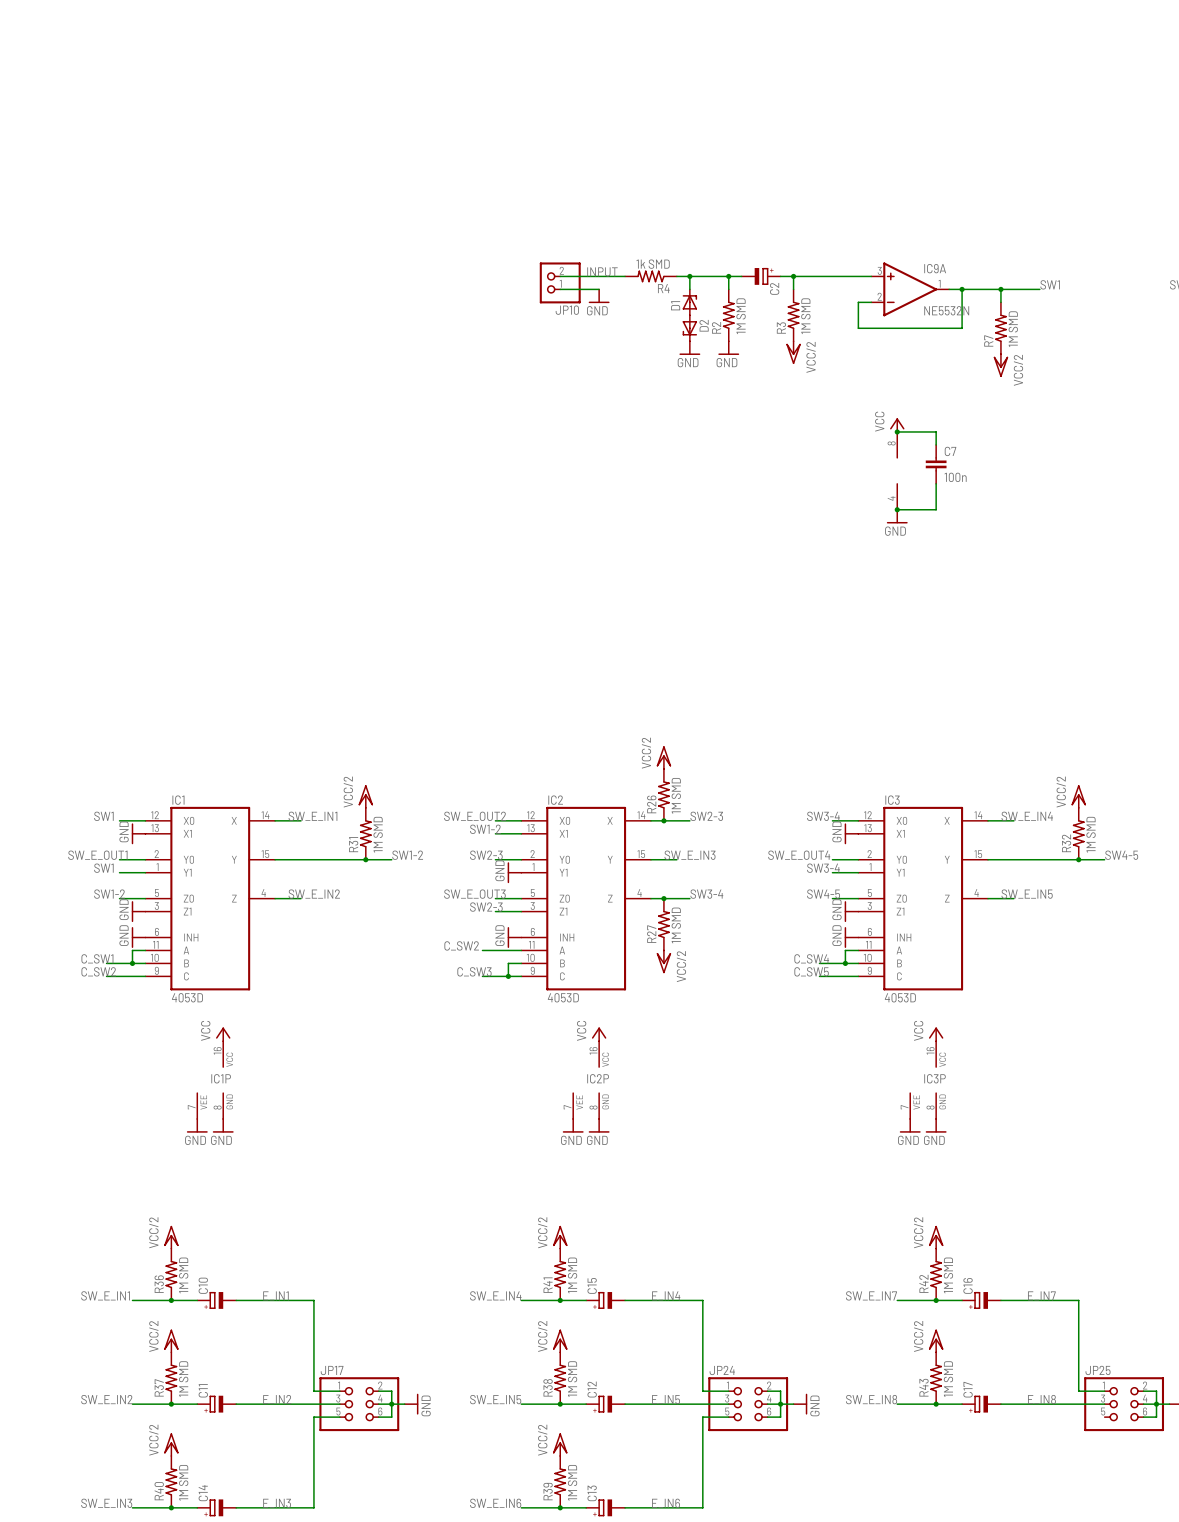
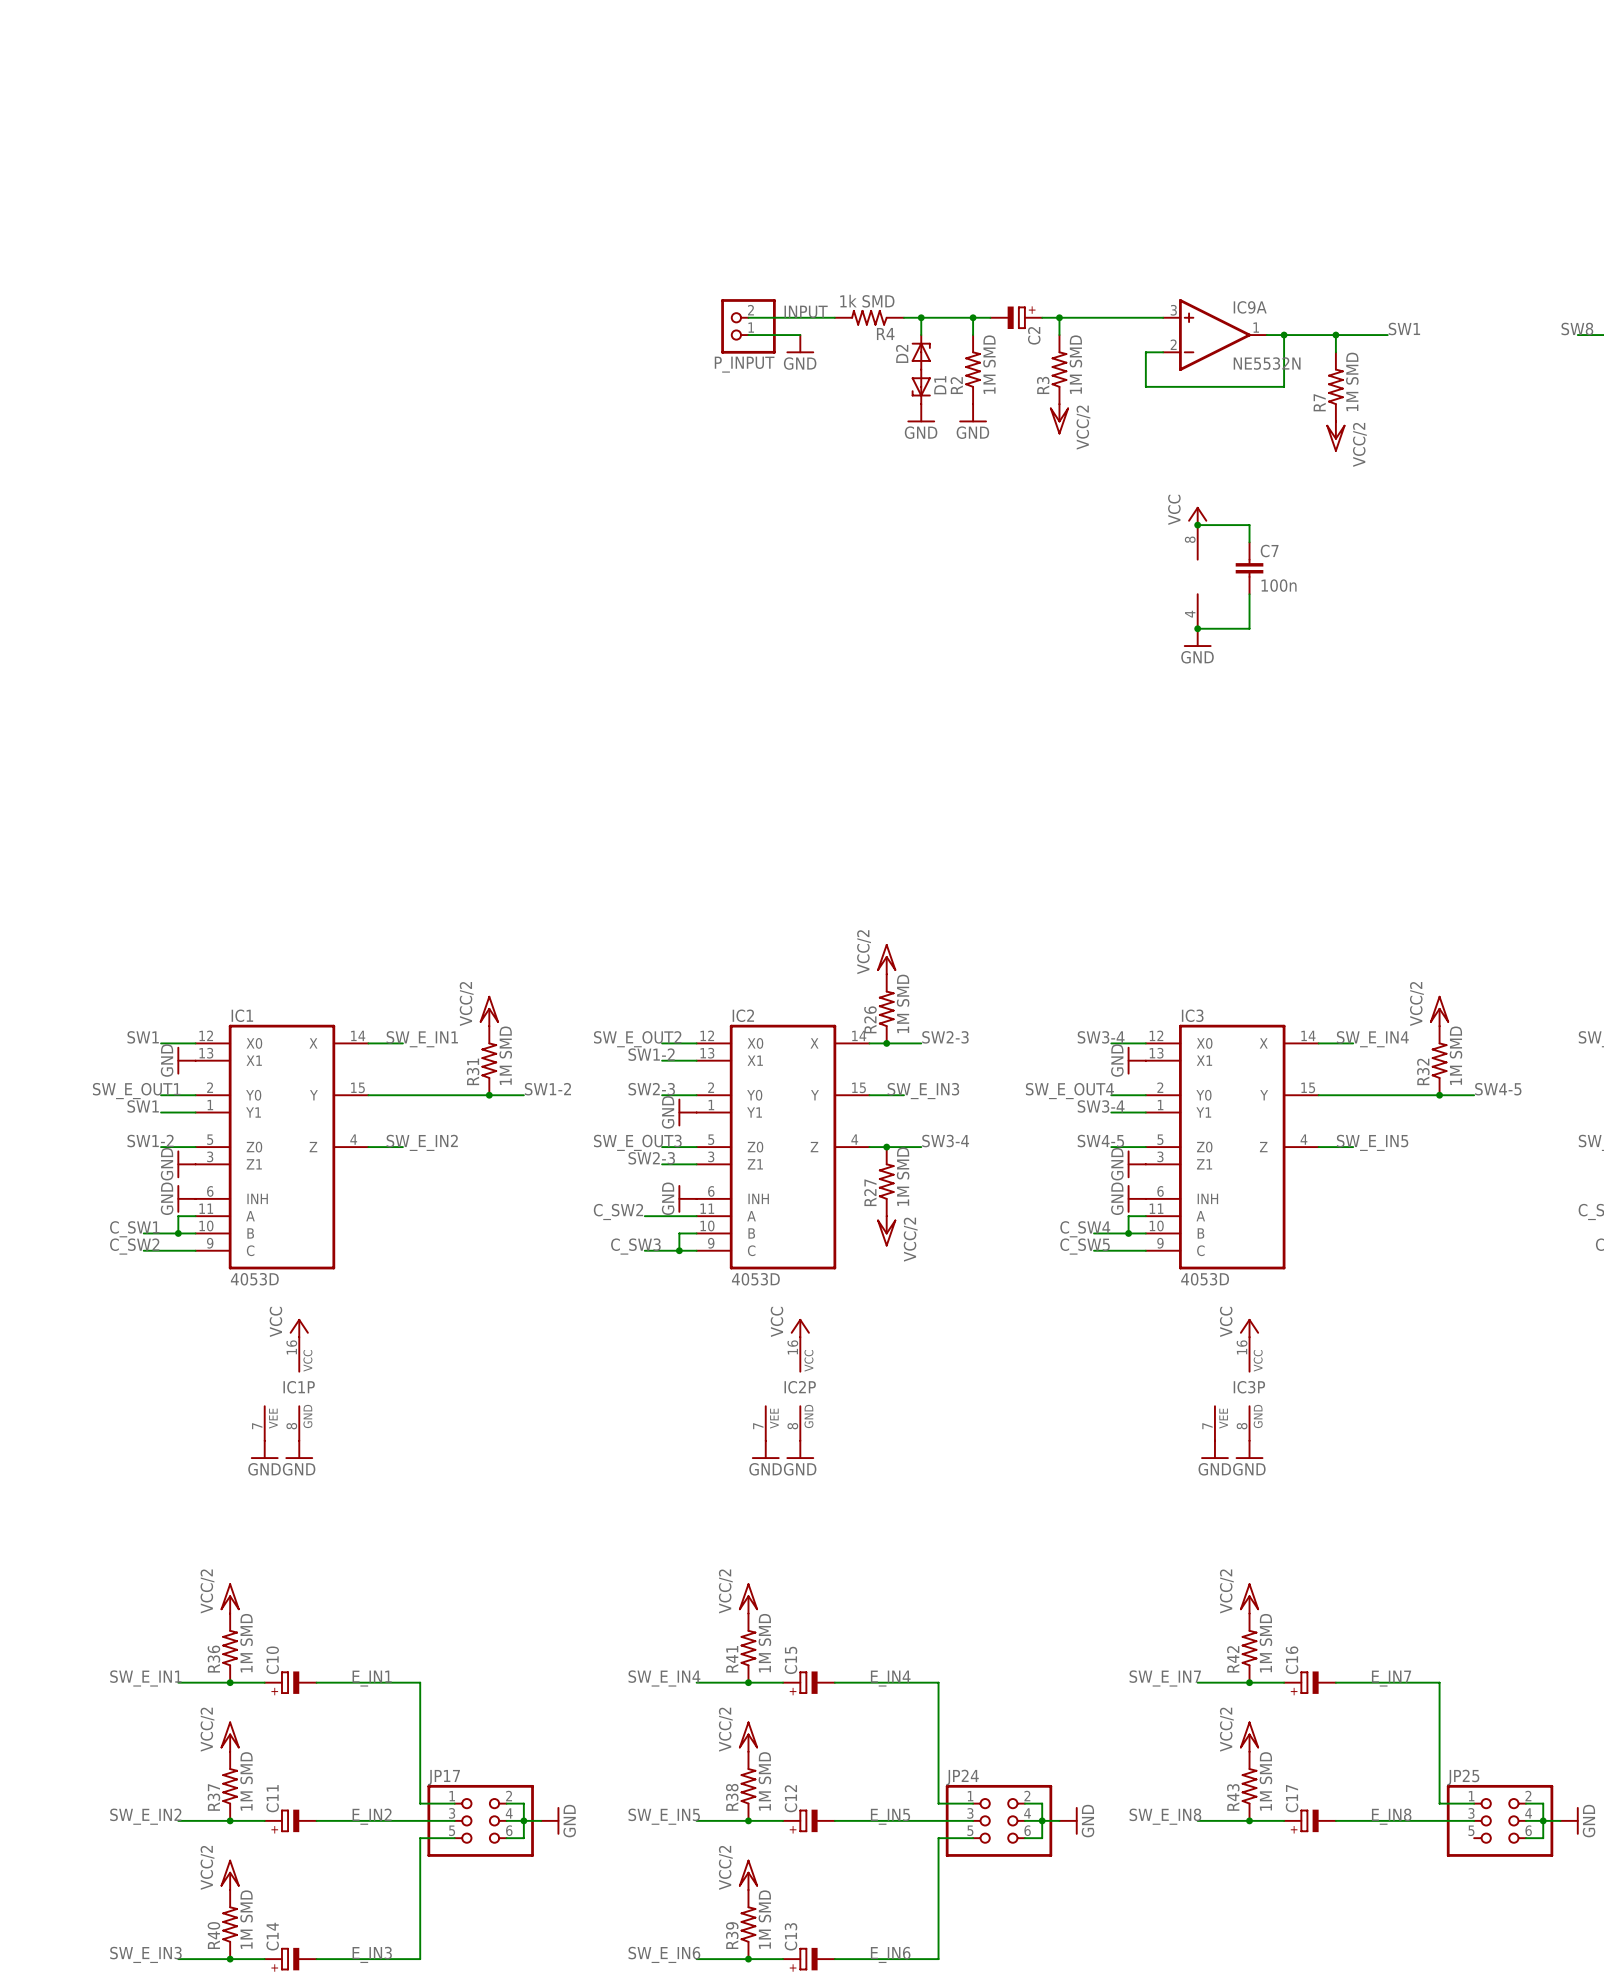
D1 name: D1 (675, 305) -> D2 (902, 353)
JP10 name: JP10 (567, 310) -> P_INPUT (744, 364)
D2 name: D2 (704, 325) -> D1 (940, 385)

